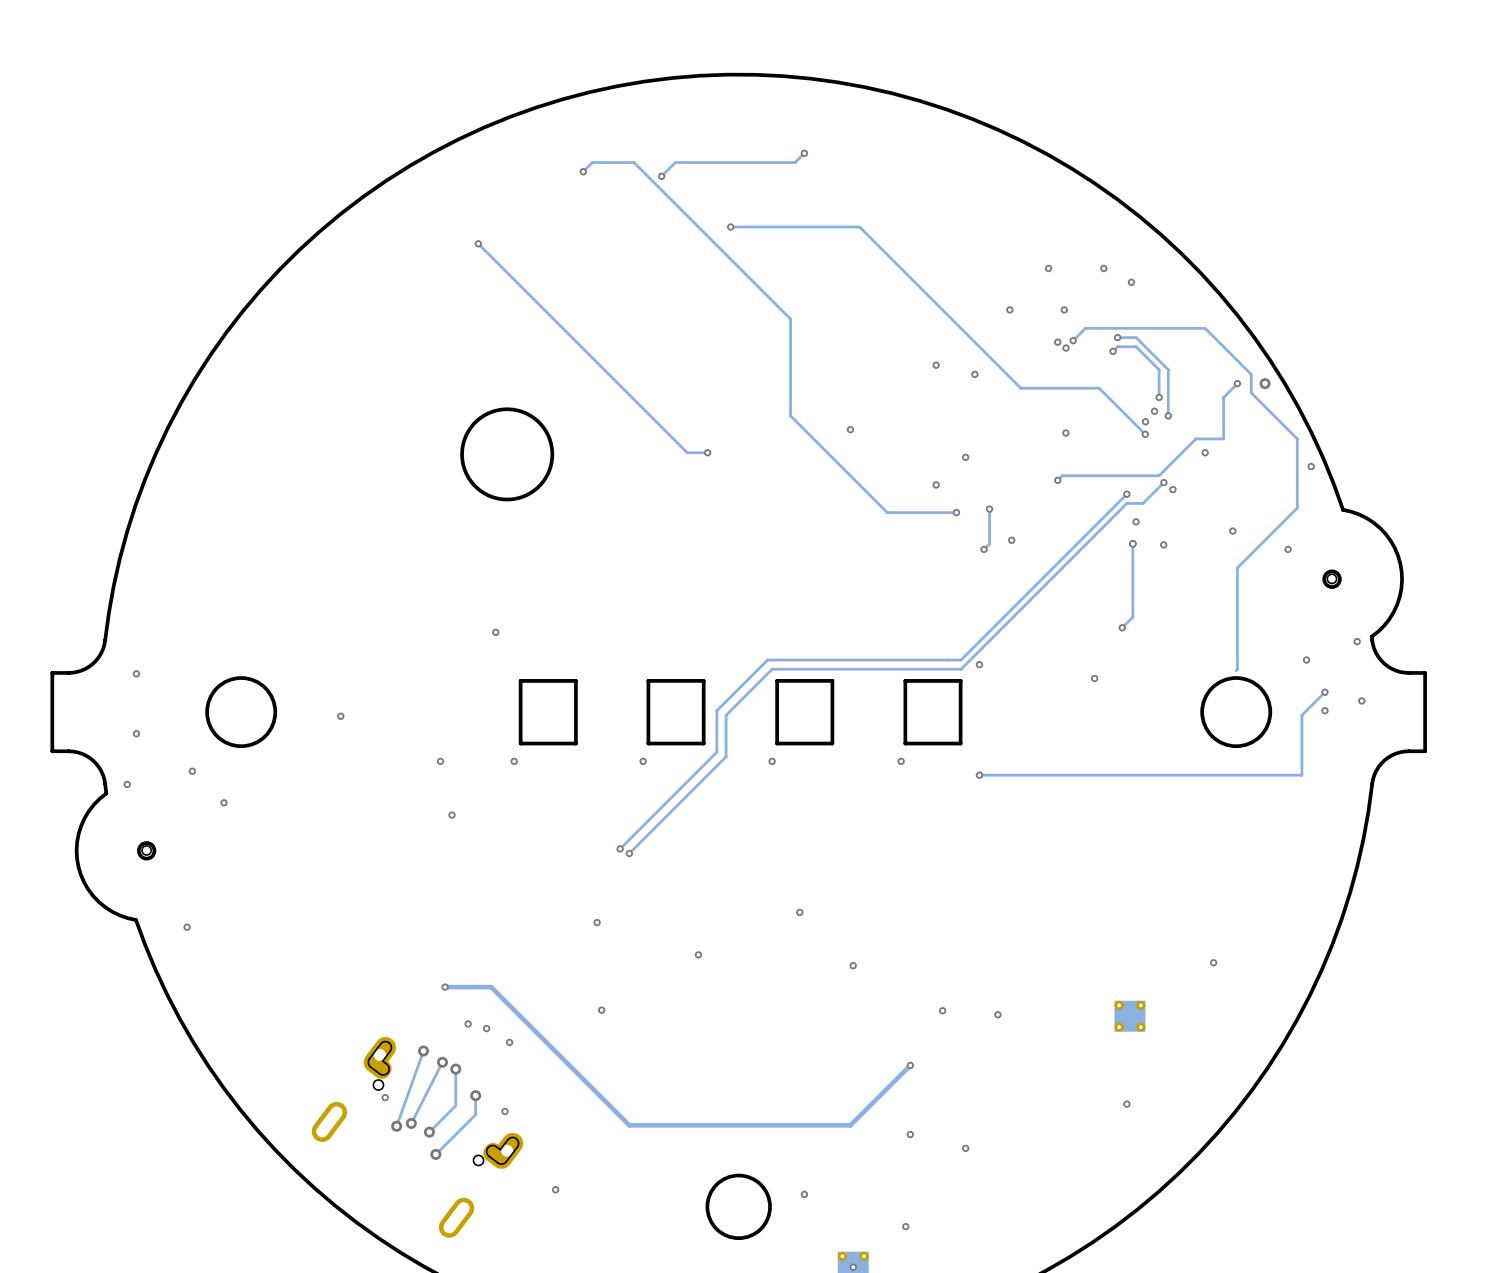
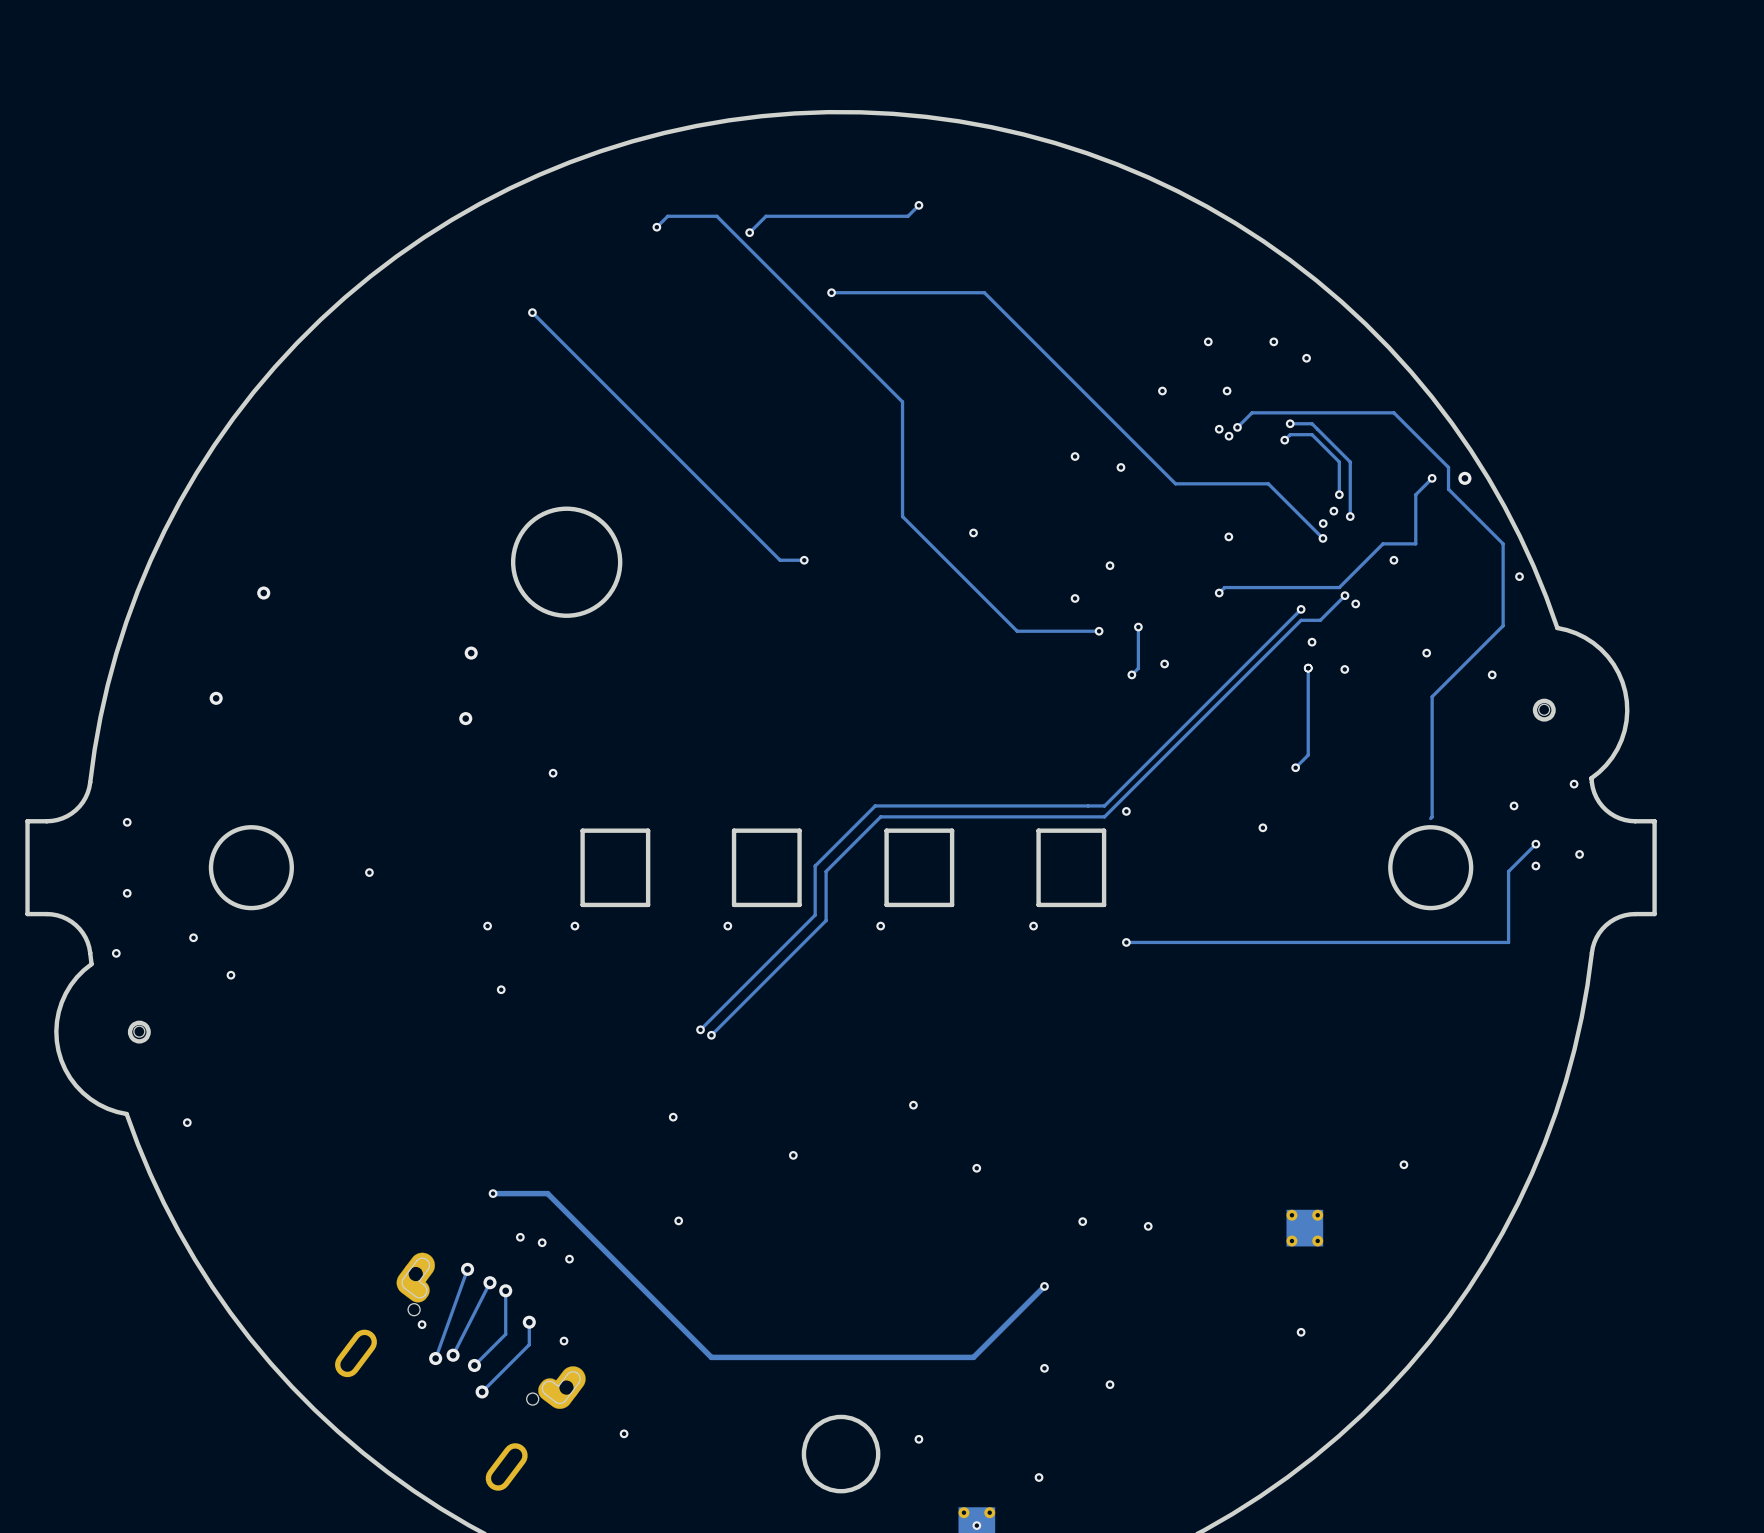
via: none -> (263, 593)
via: none -> (471, 653)
via: none -> (216, 698)
via: none -> (465, 718)

